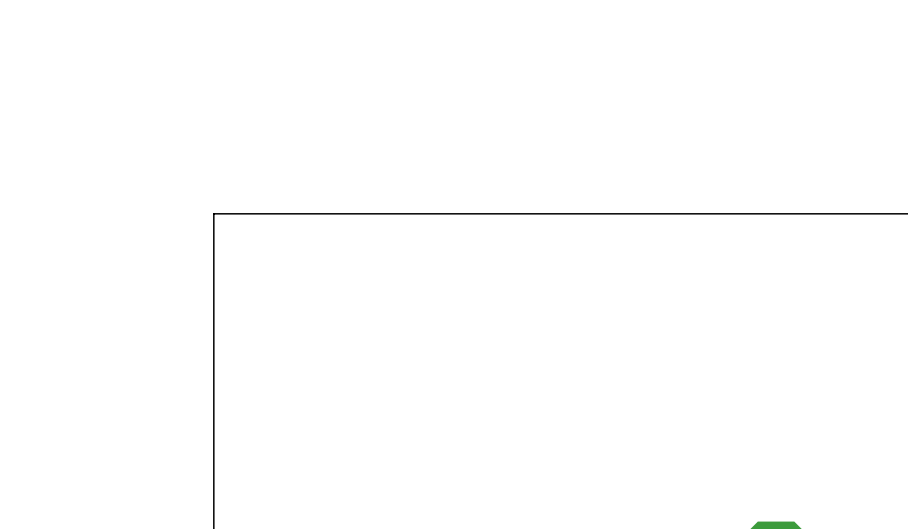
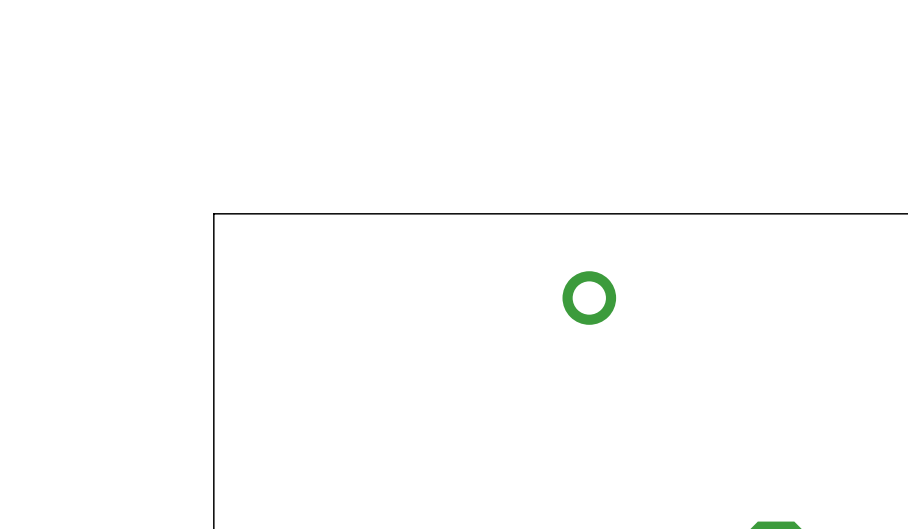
via: none -> (589, 298)

